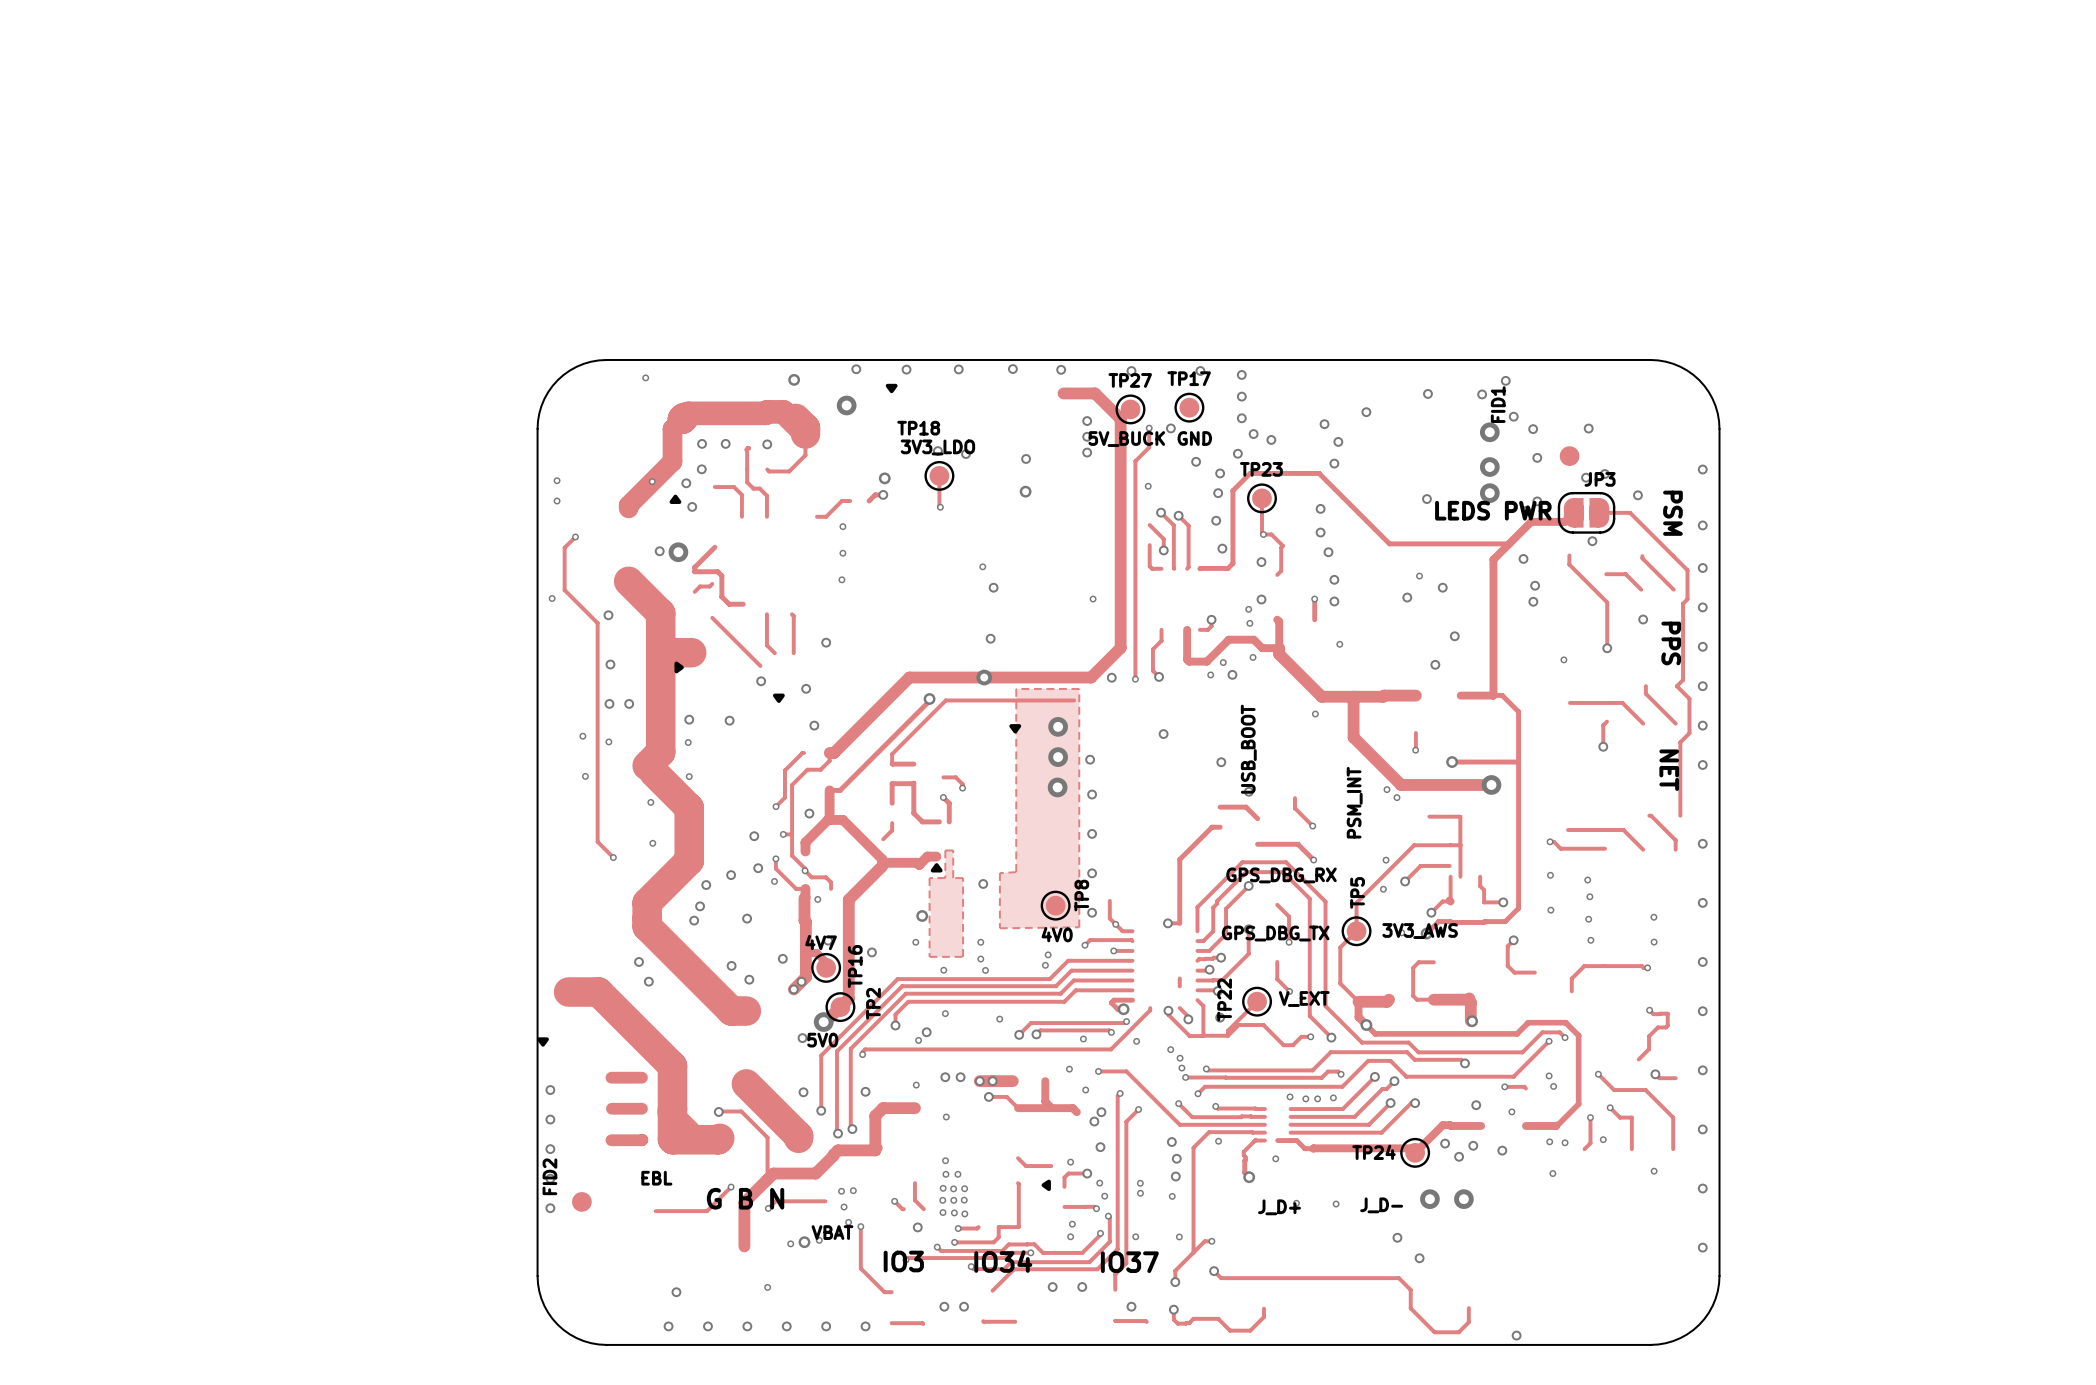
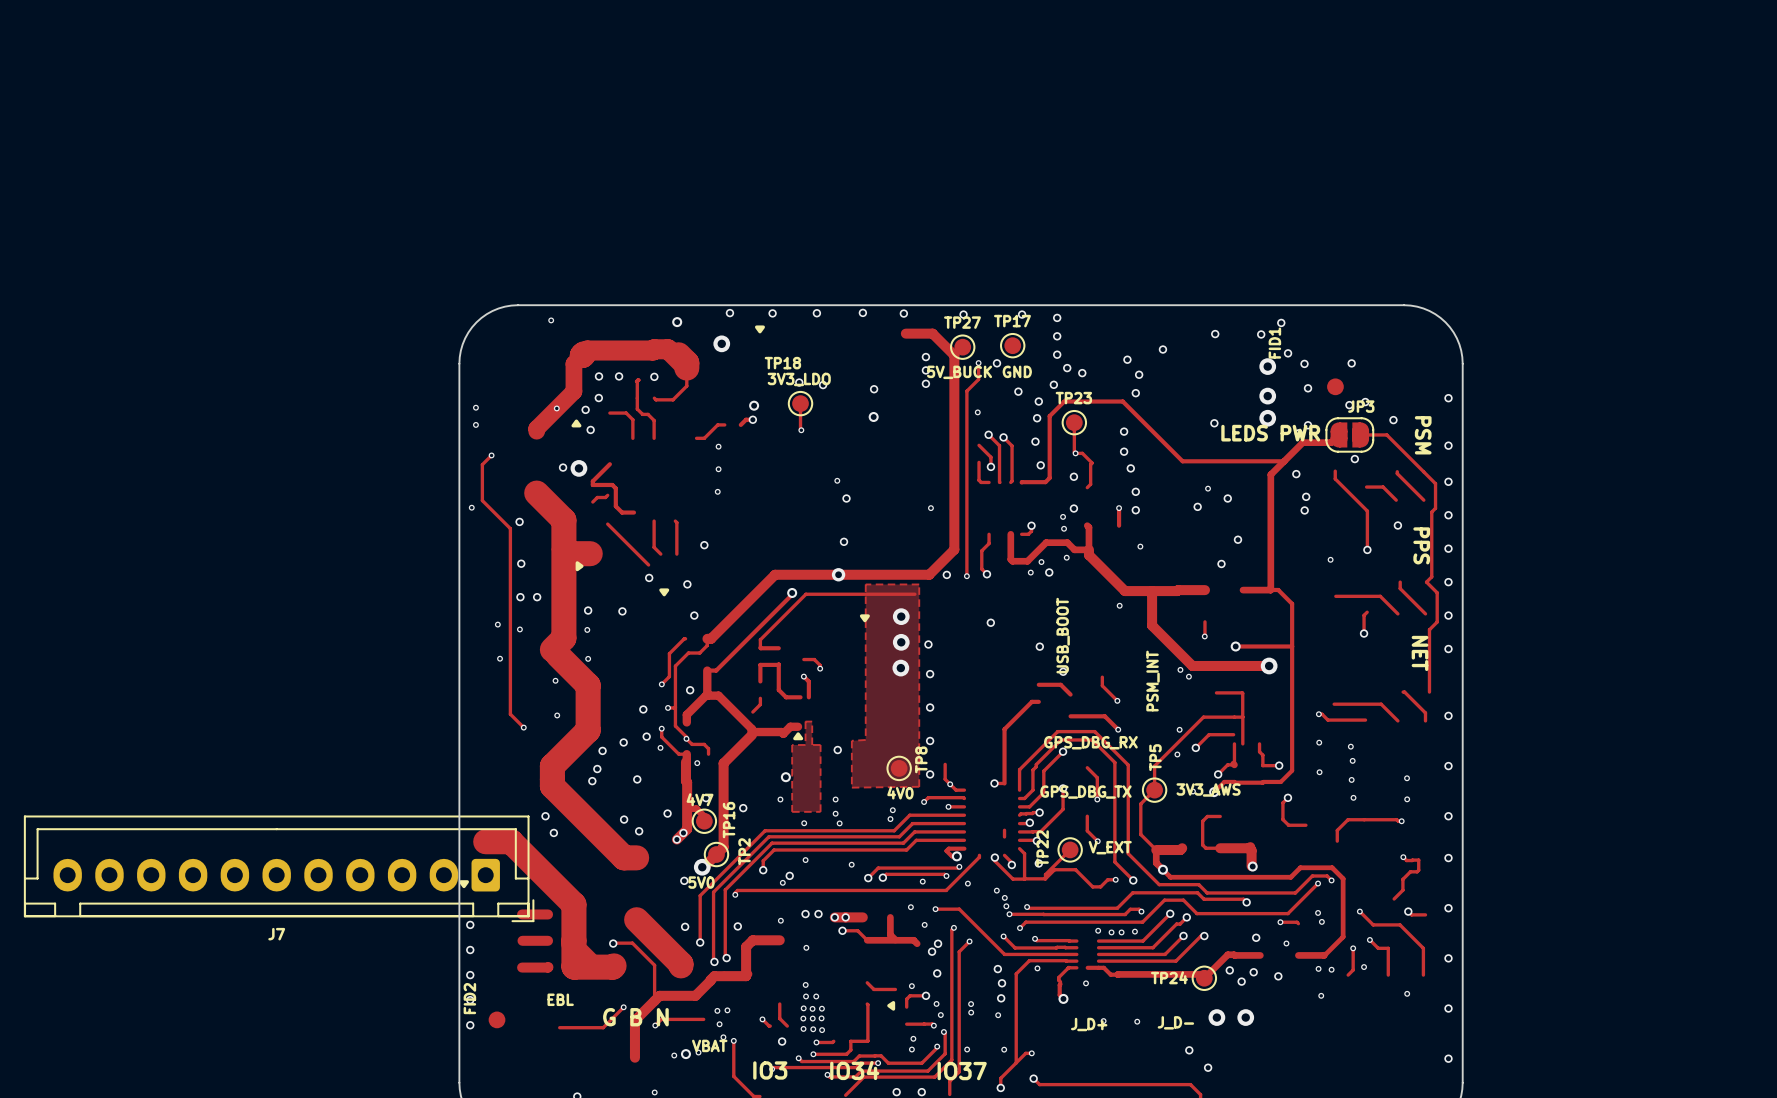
J7: none -> (279, 868)

